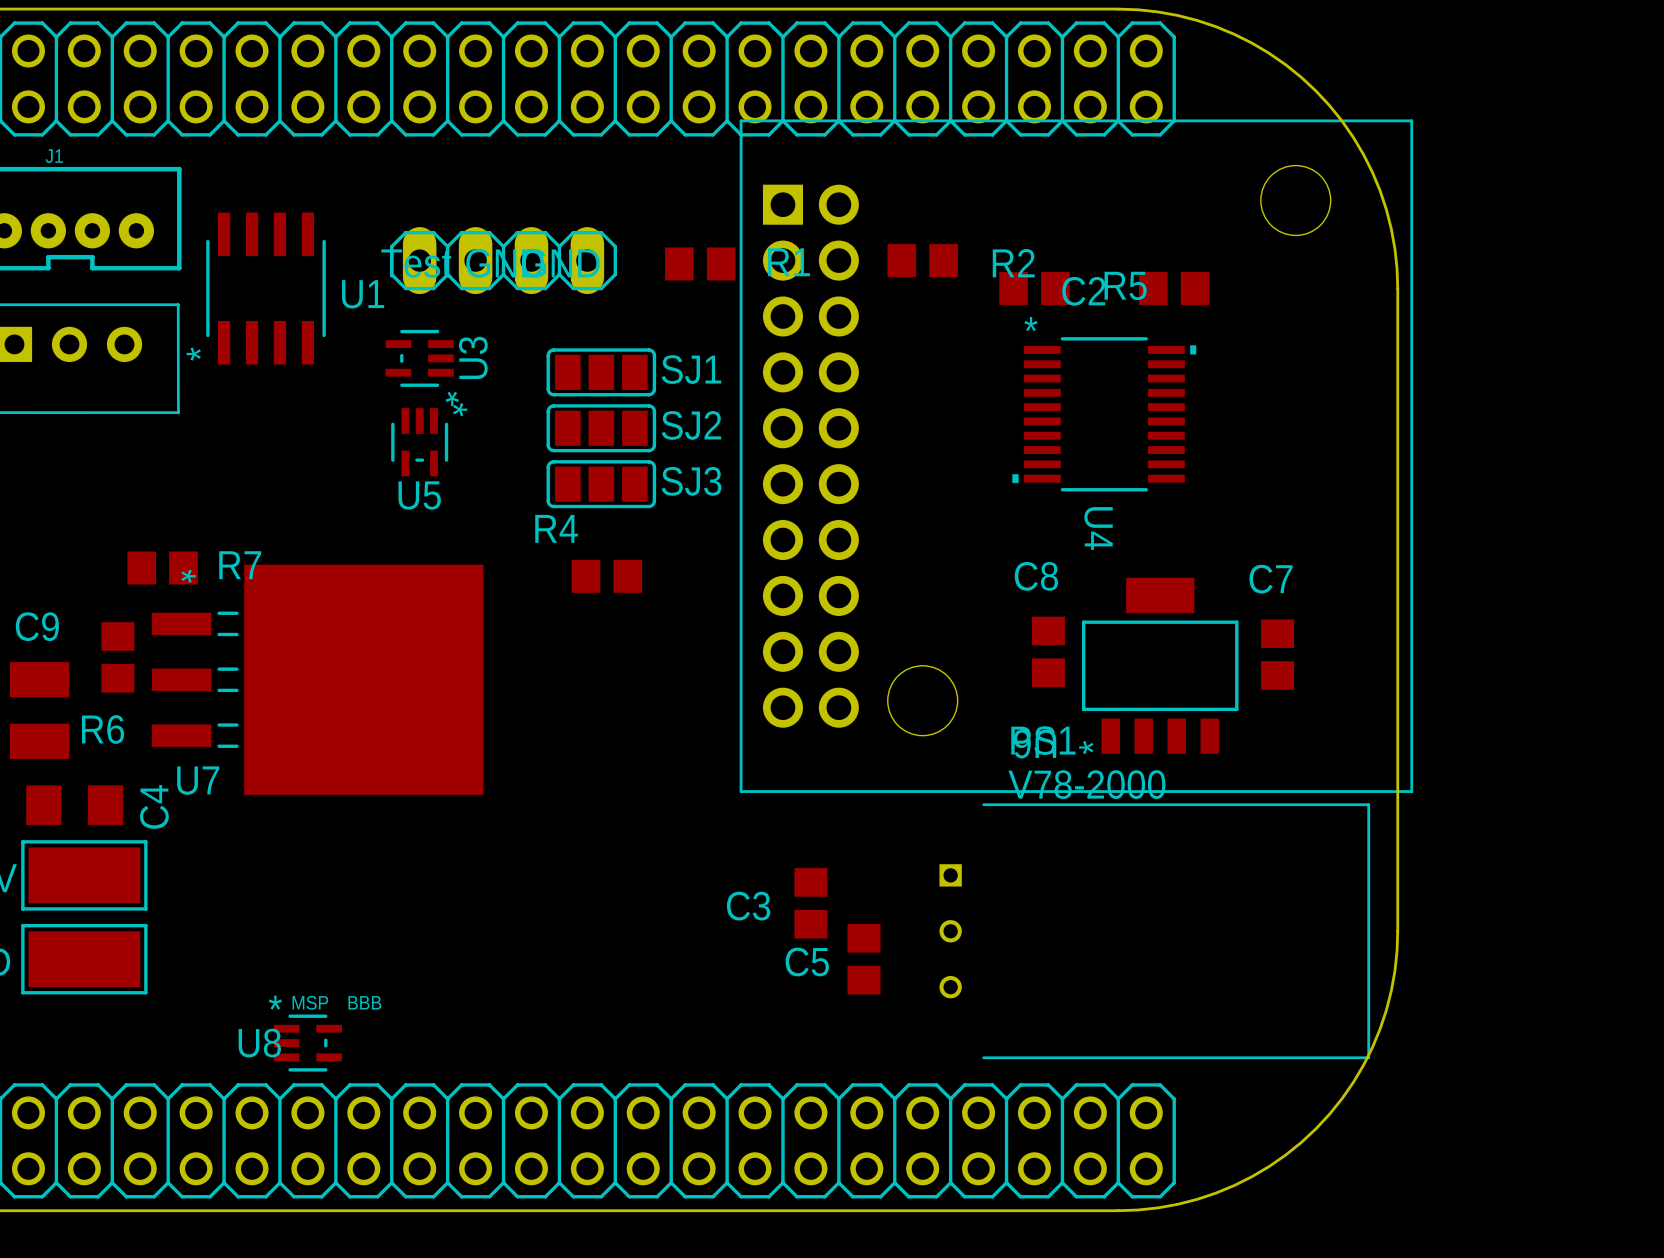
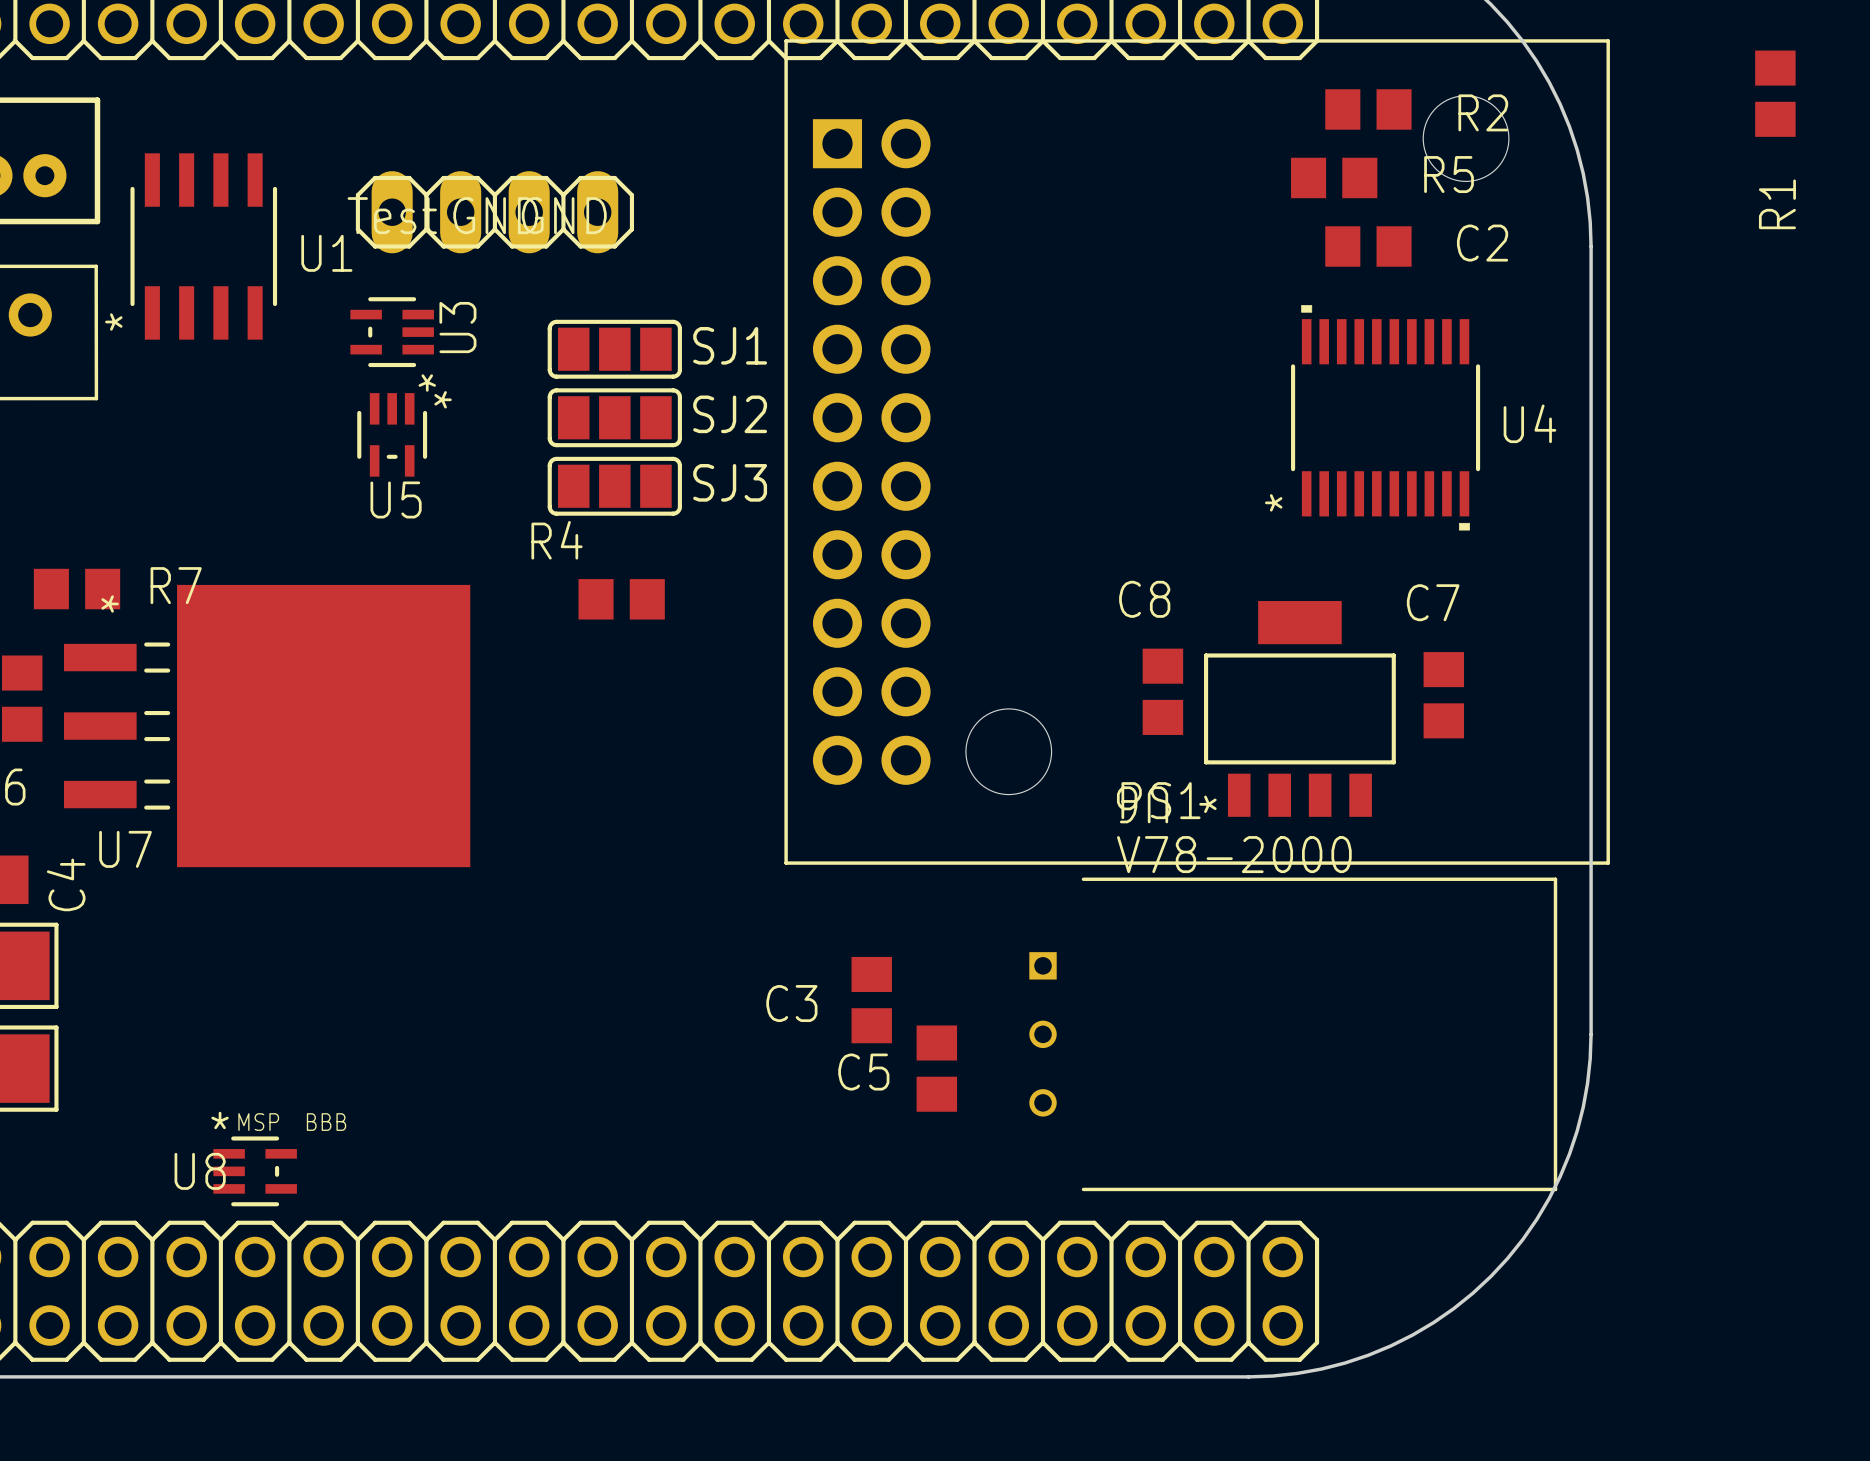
R2 position: (922, 260) -> (1368, 109)
R1 rotation: 0° (700, 263) -> 90° clockwise (1775, 93)
R1 position: (700, 263) -> (1775, 93)
R5 position: (1034, 288) -> (1334, 177)
C2 position: (1174, 288) -> (1368, 246)
C2 name position: C2 (1083, 291) -> C2 (1482, 243)
U4 rotation: 0° (1104, 414) -> 90° counterclockwise (1385, 417)
U4 position: (1104, 414) -> (1385, 417)

